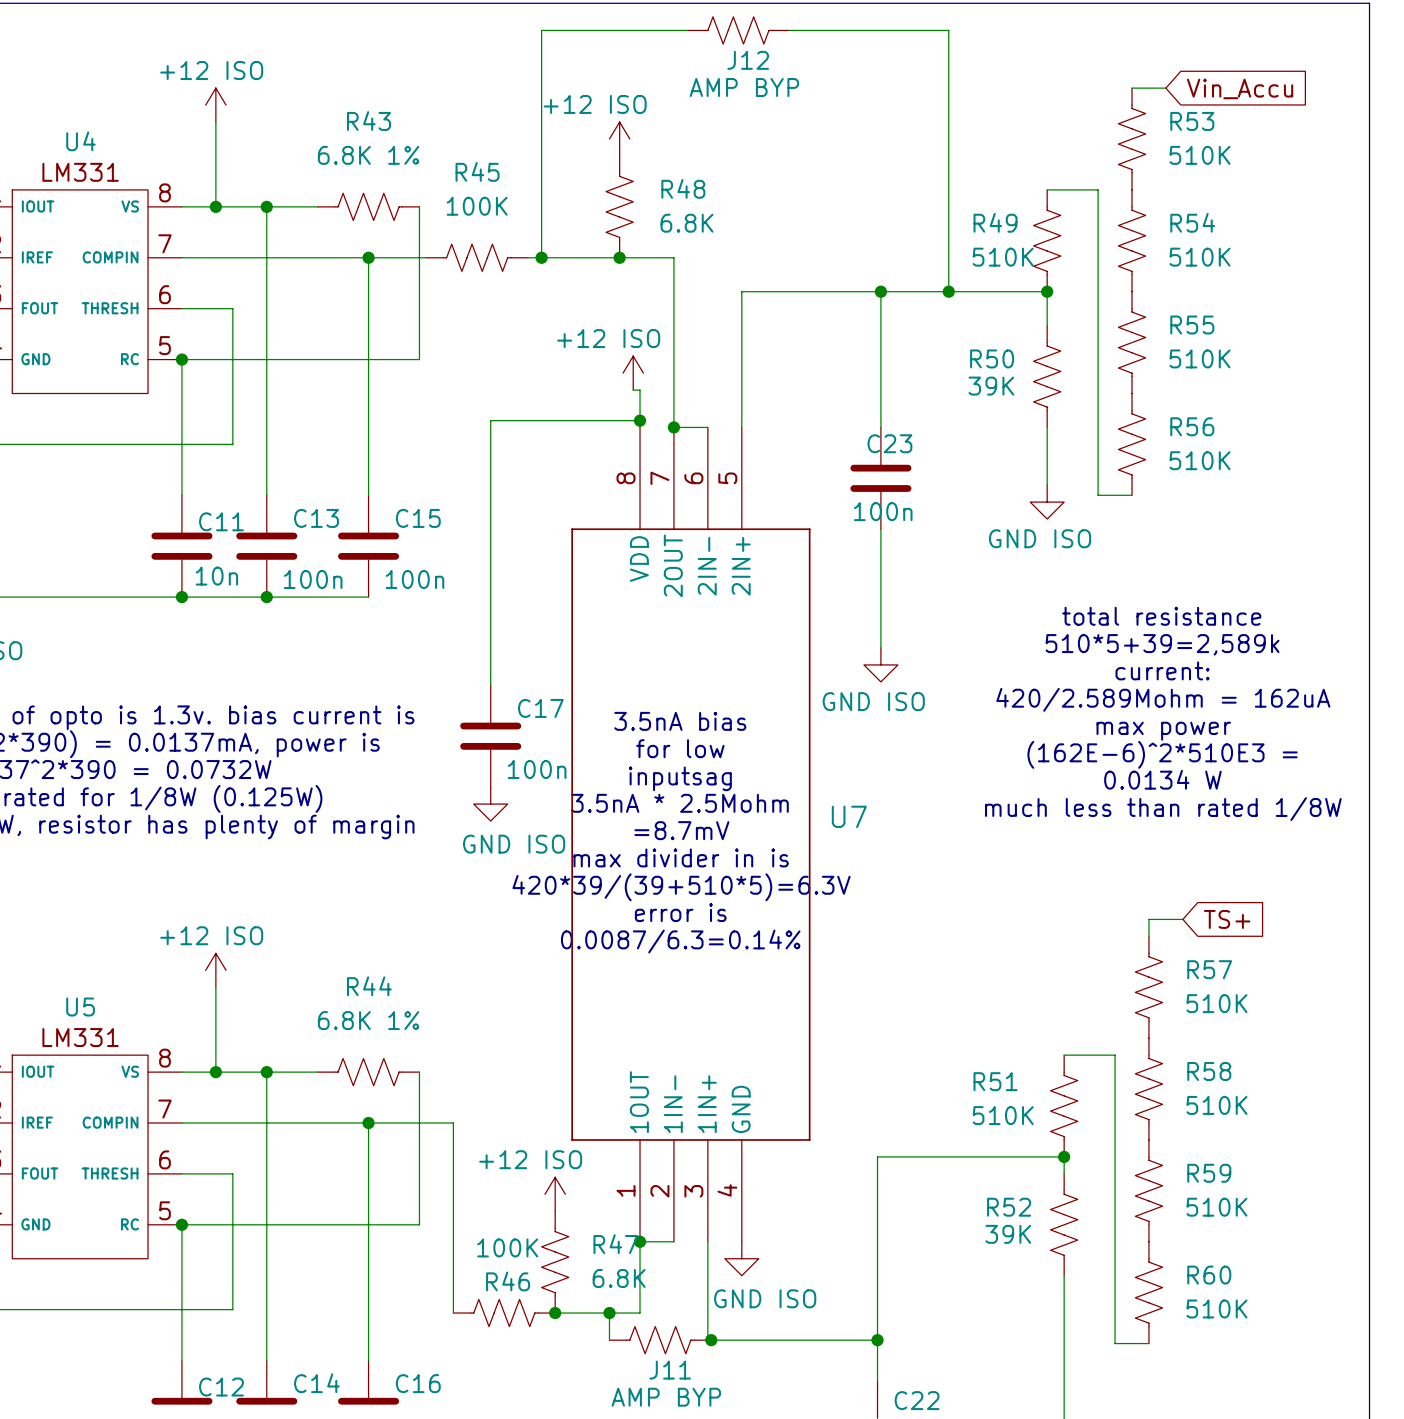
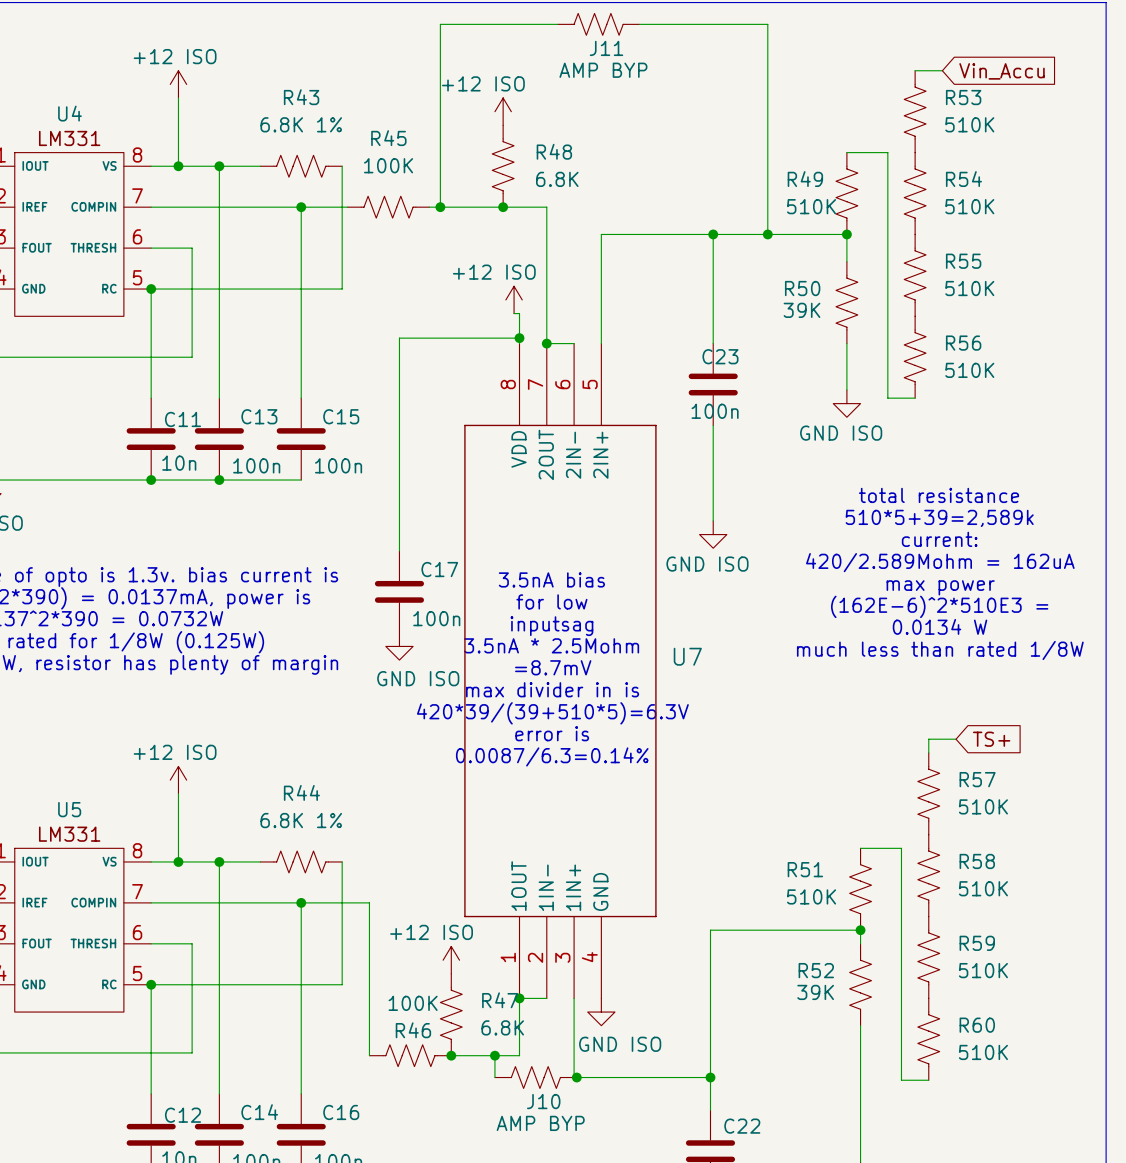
J12 name: J12 (748, 60) -> J11 (606, 48)
J11 name: J11 (670, 1370) -> J10 (543, 1101)

